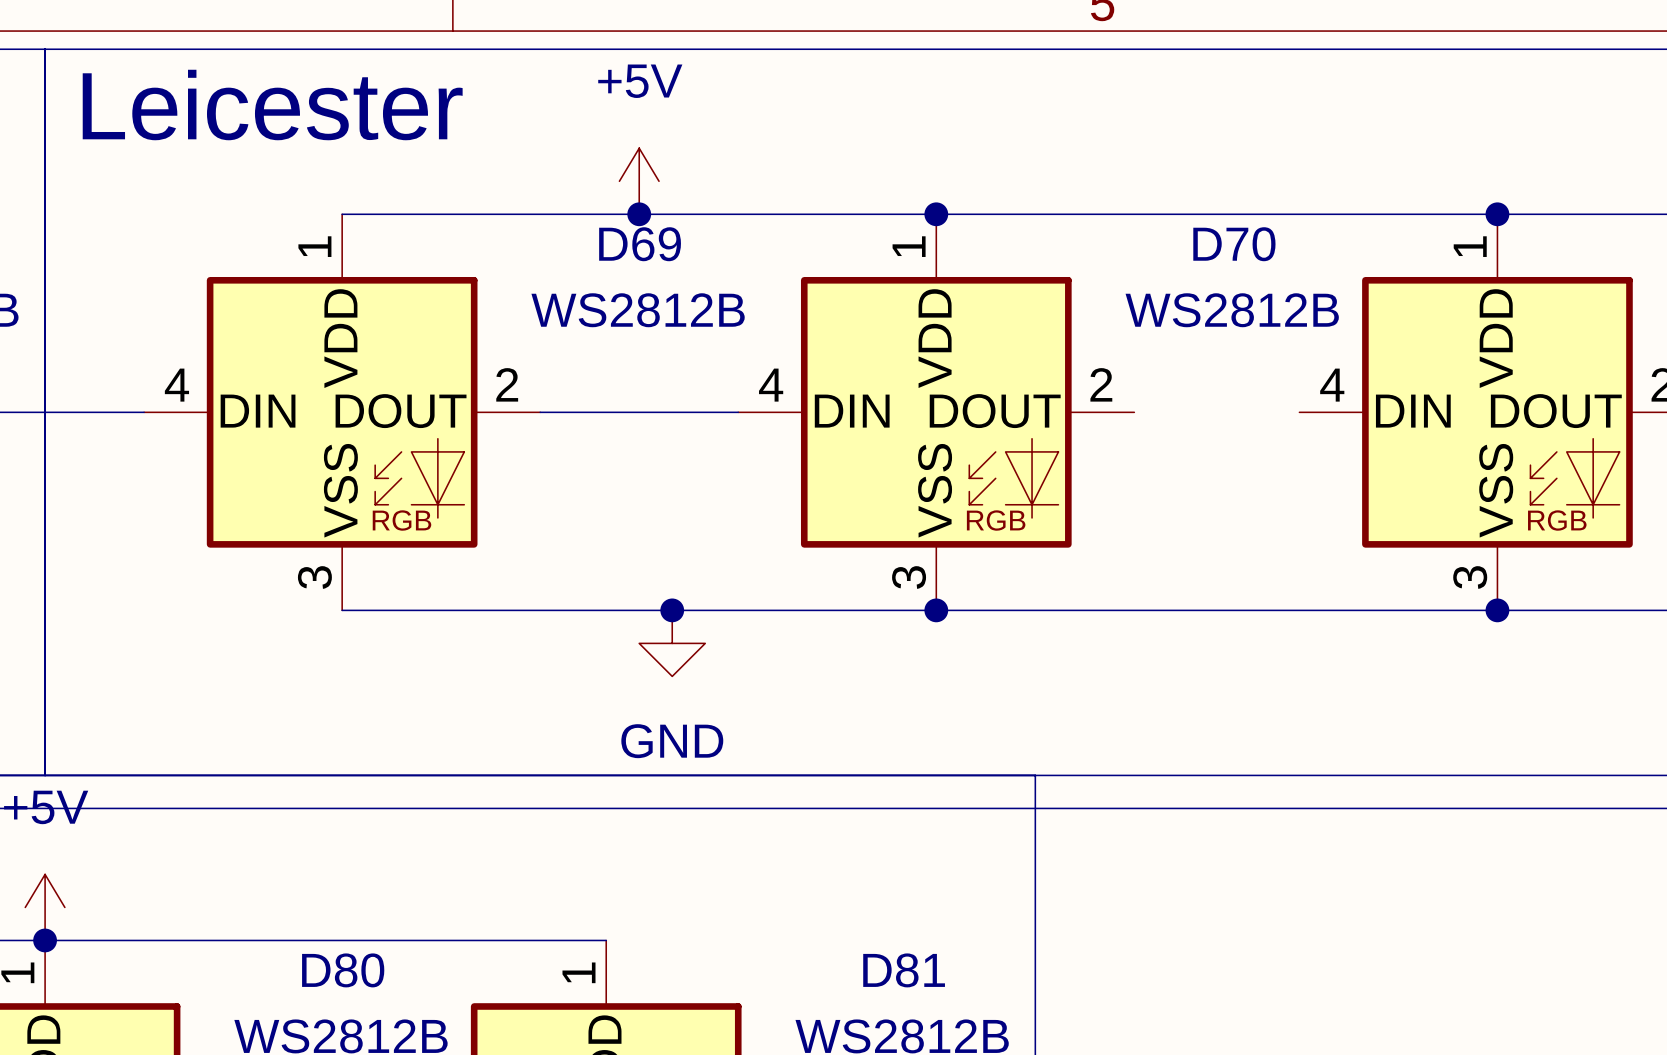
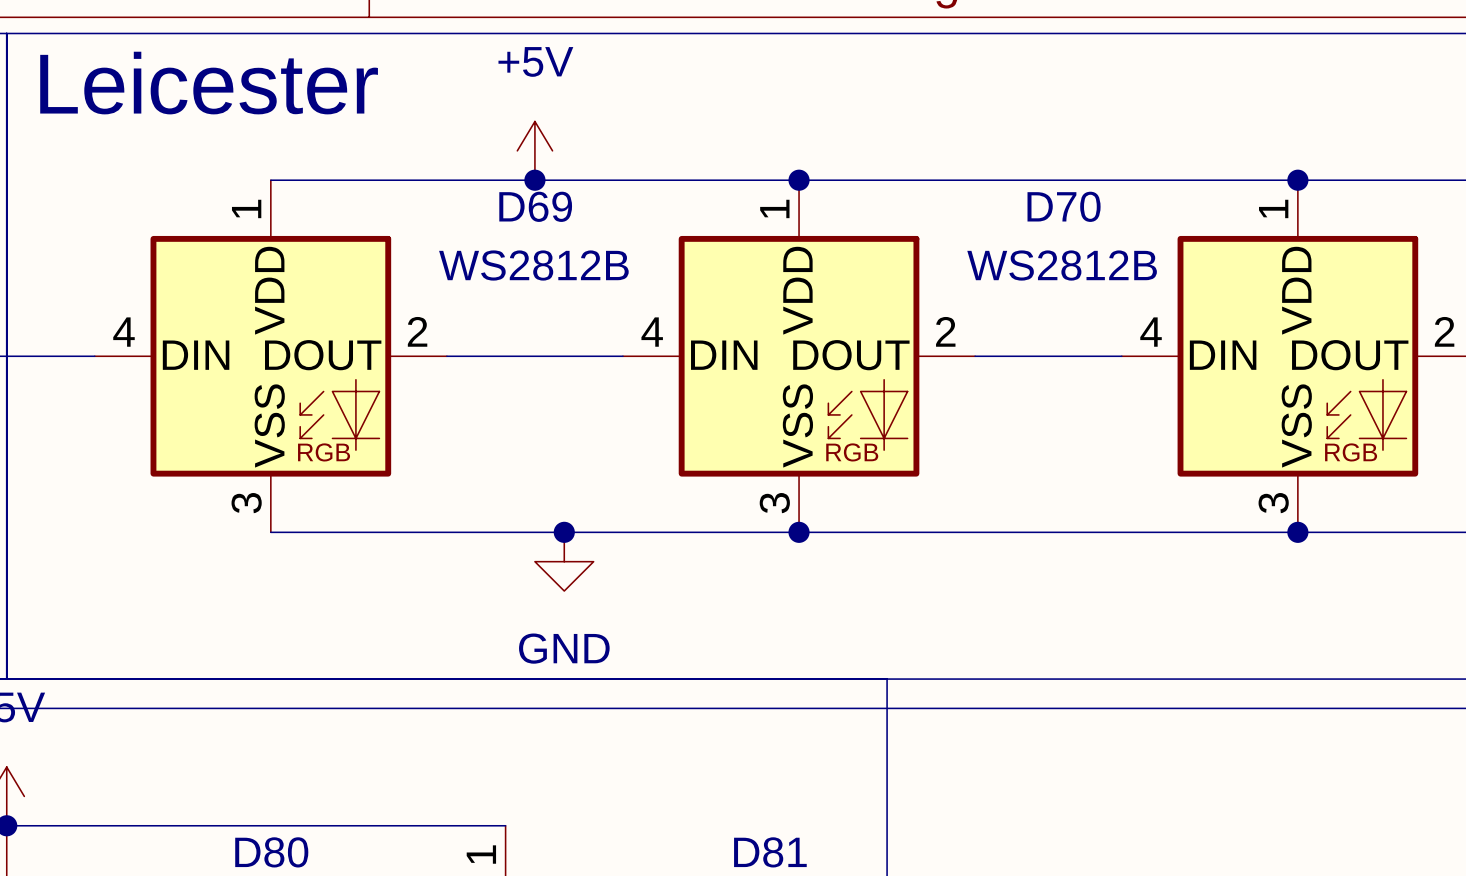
wire: none -> (975, 356) (1121, 356)

